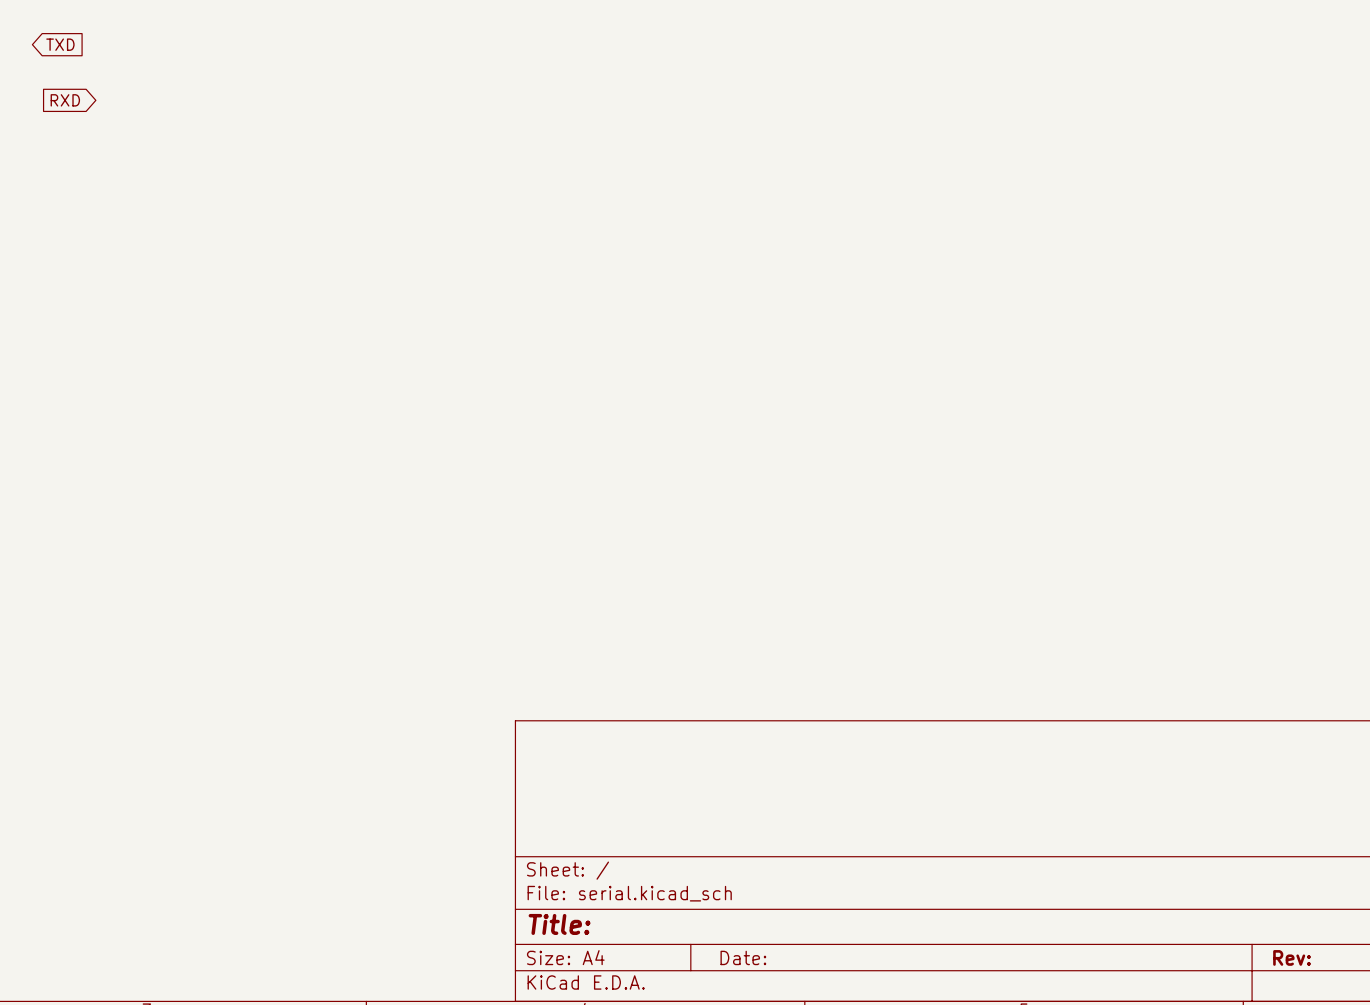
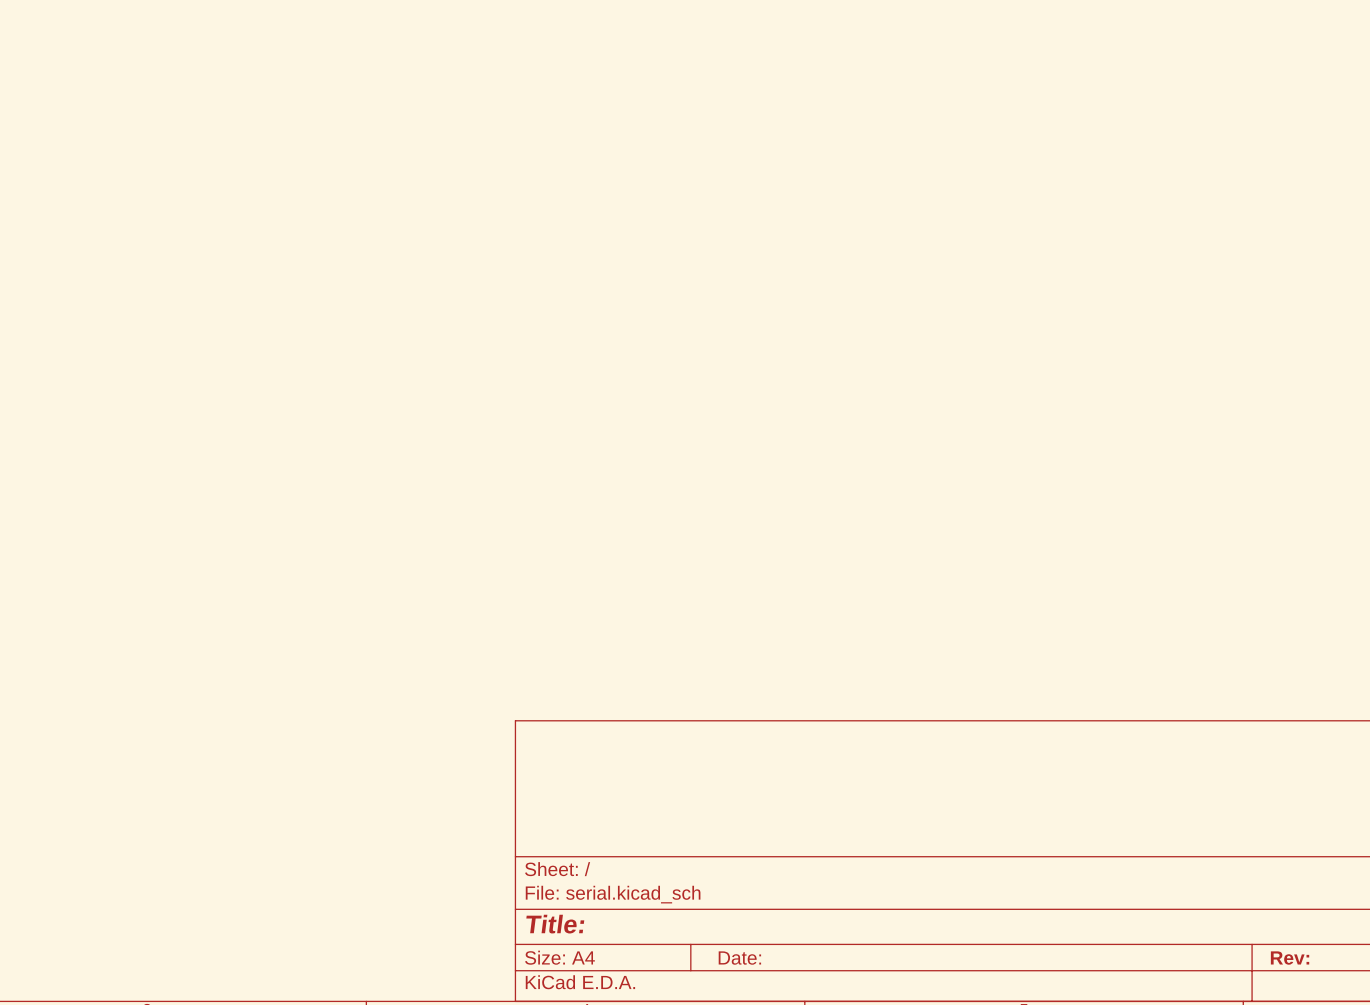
global label: TXD (60, 44) -> none
global label: RXD (65, 100) -> none

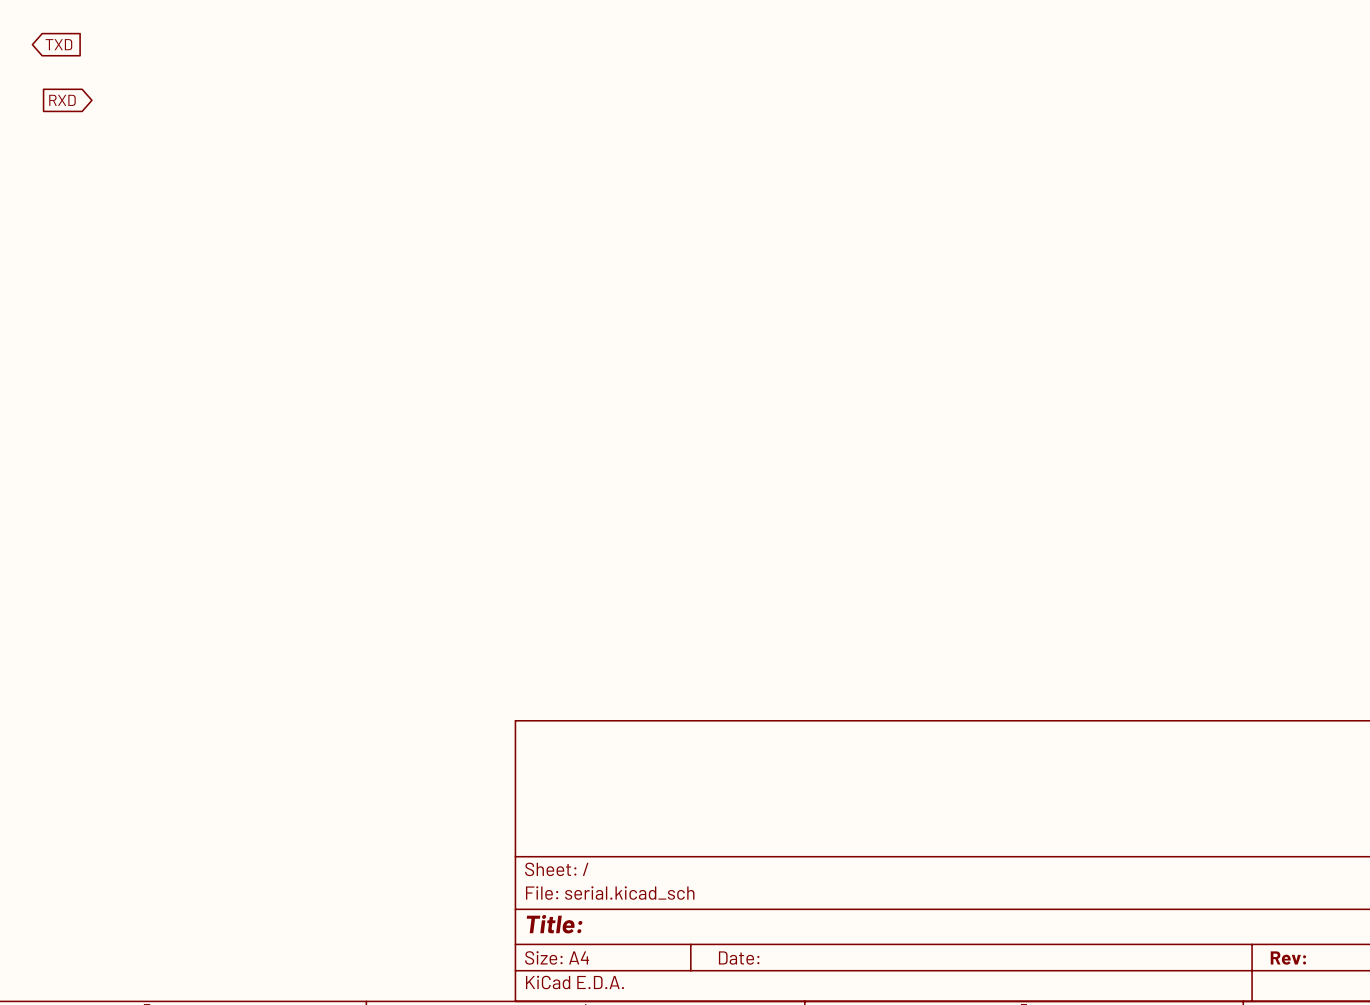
global label: none -> TXD (58, 44)
global label: none -> RXD (62, 100)

